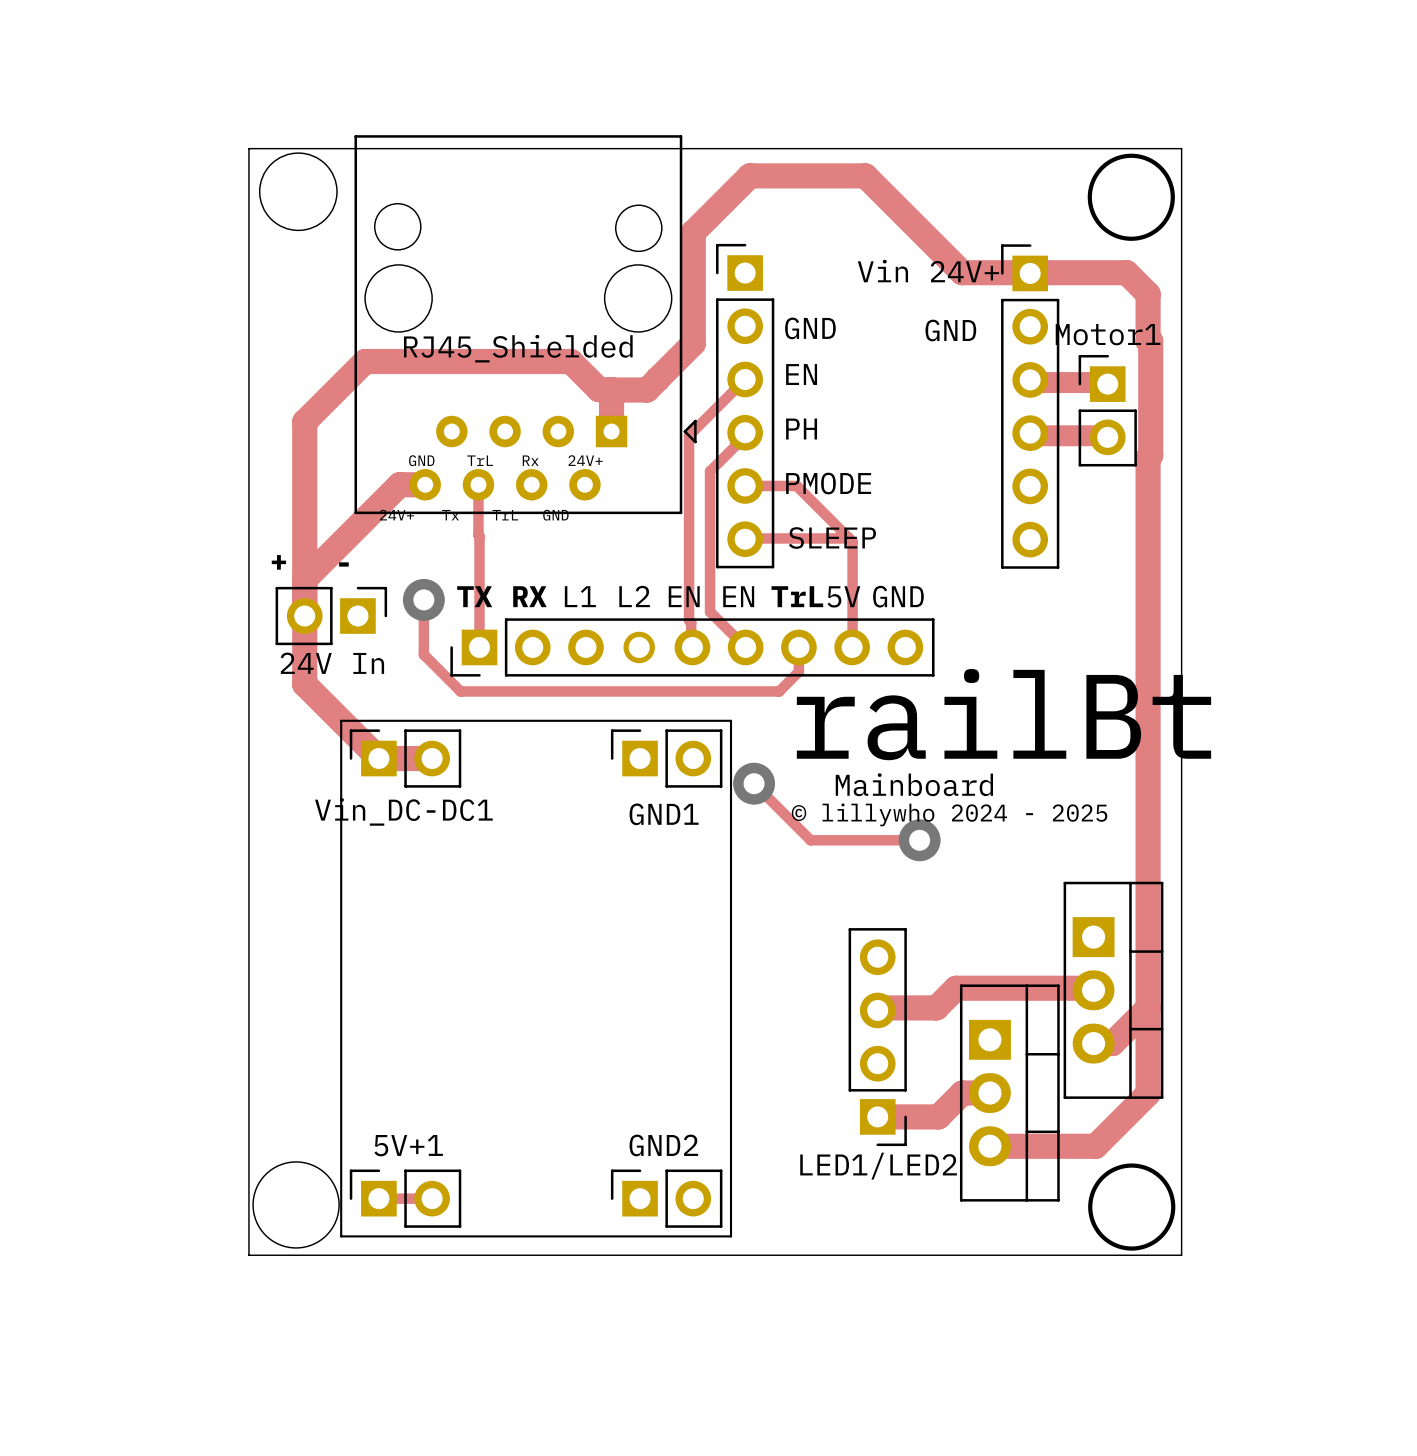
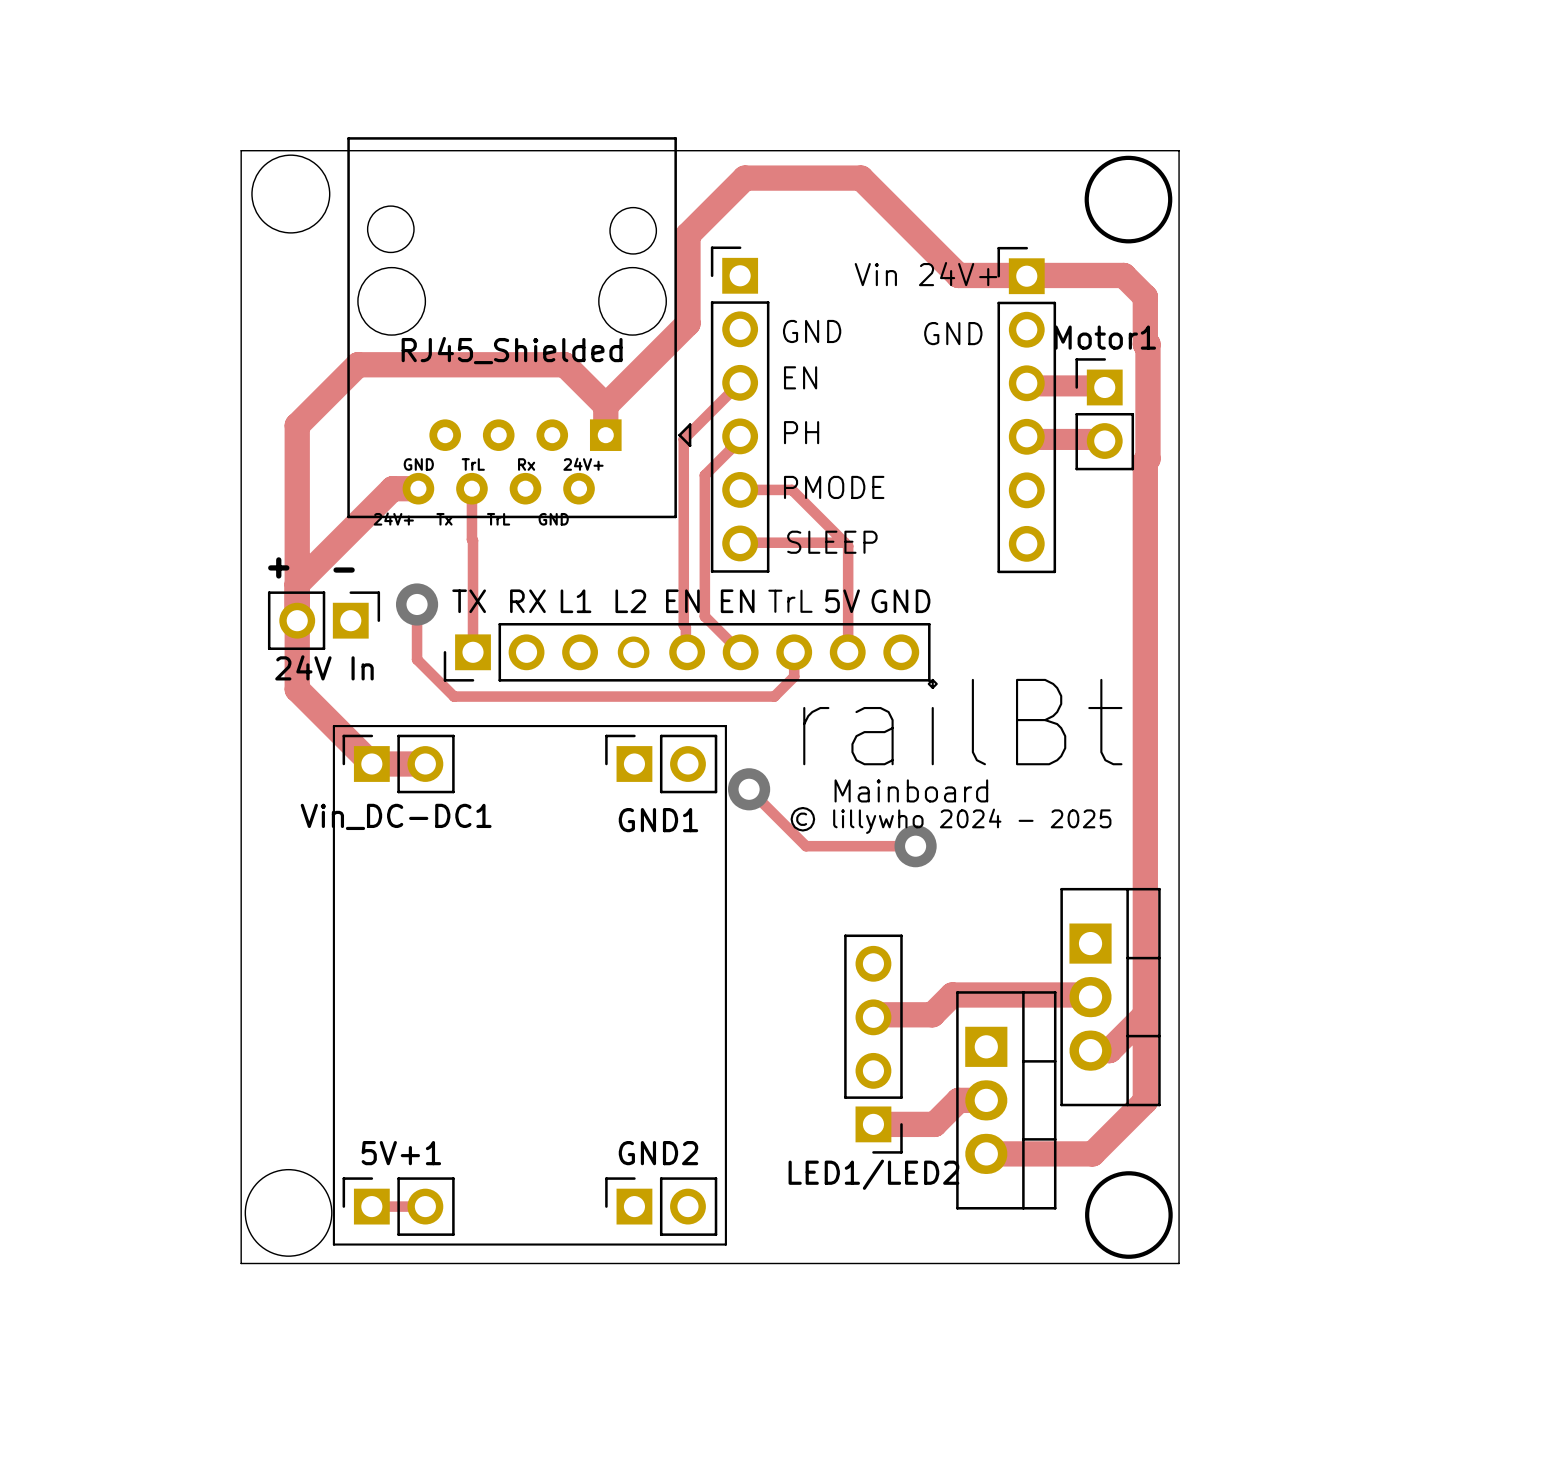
track: (693, 320) (693, 343) (657, 379) -> (687, 323) (605, 405) (593, 393)
track: (657, 379) (647, 390) (611, 389) -> none

